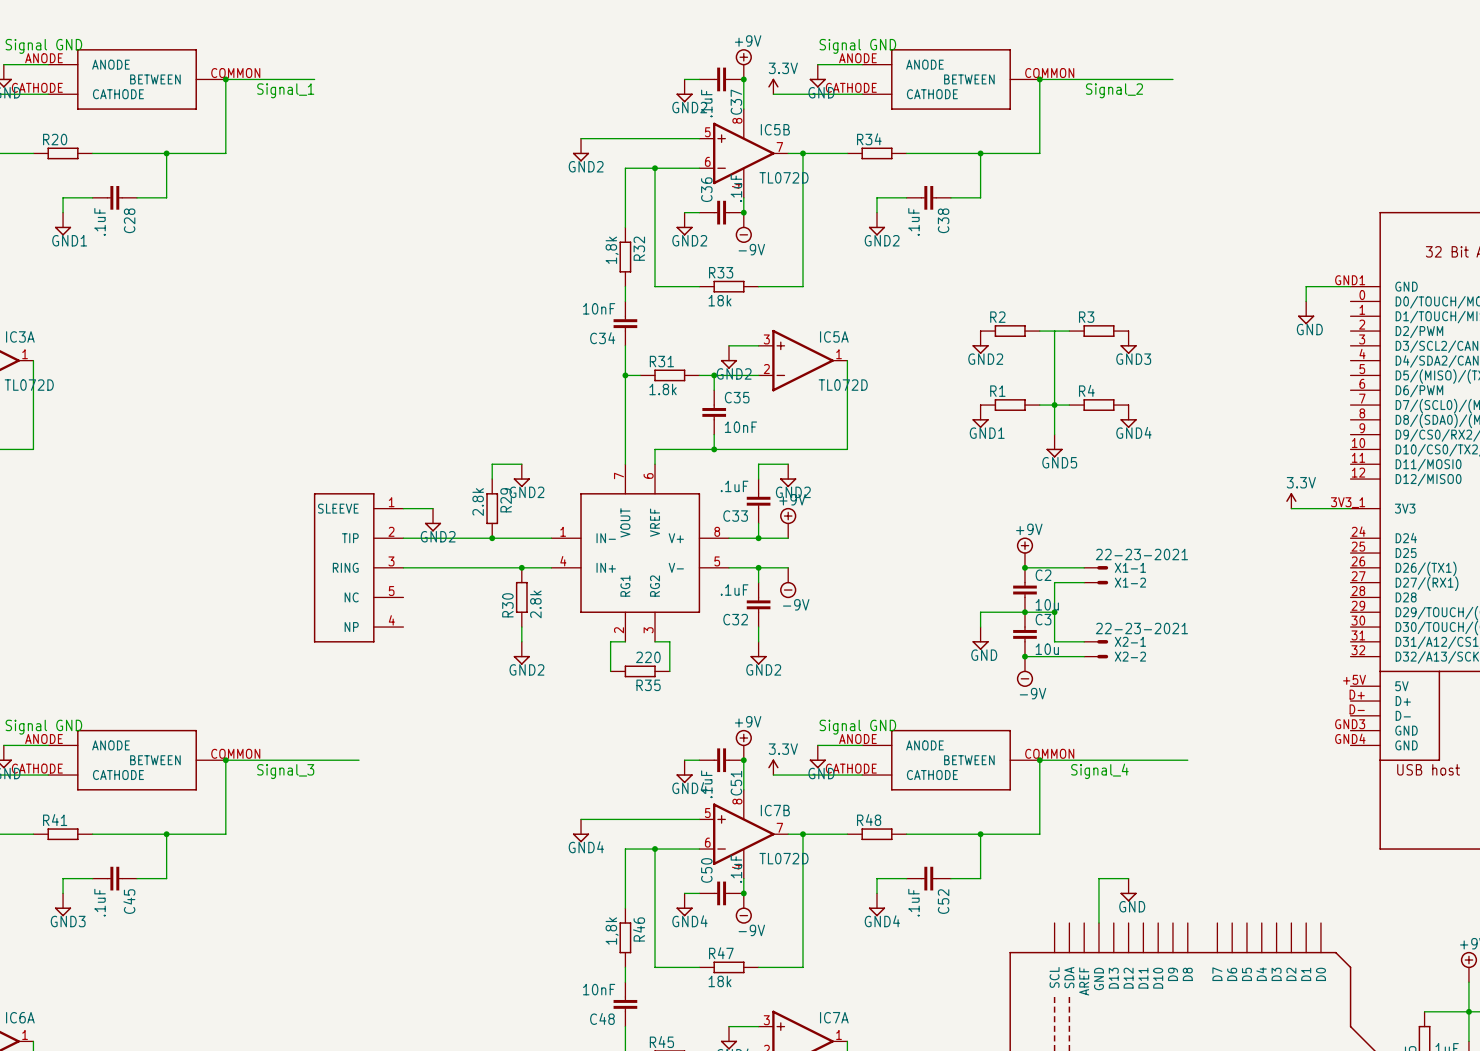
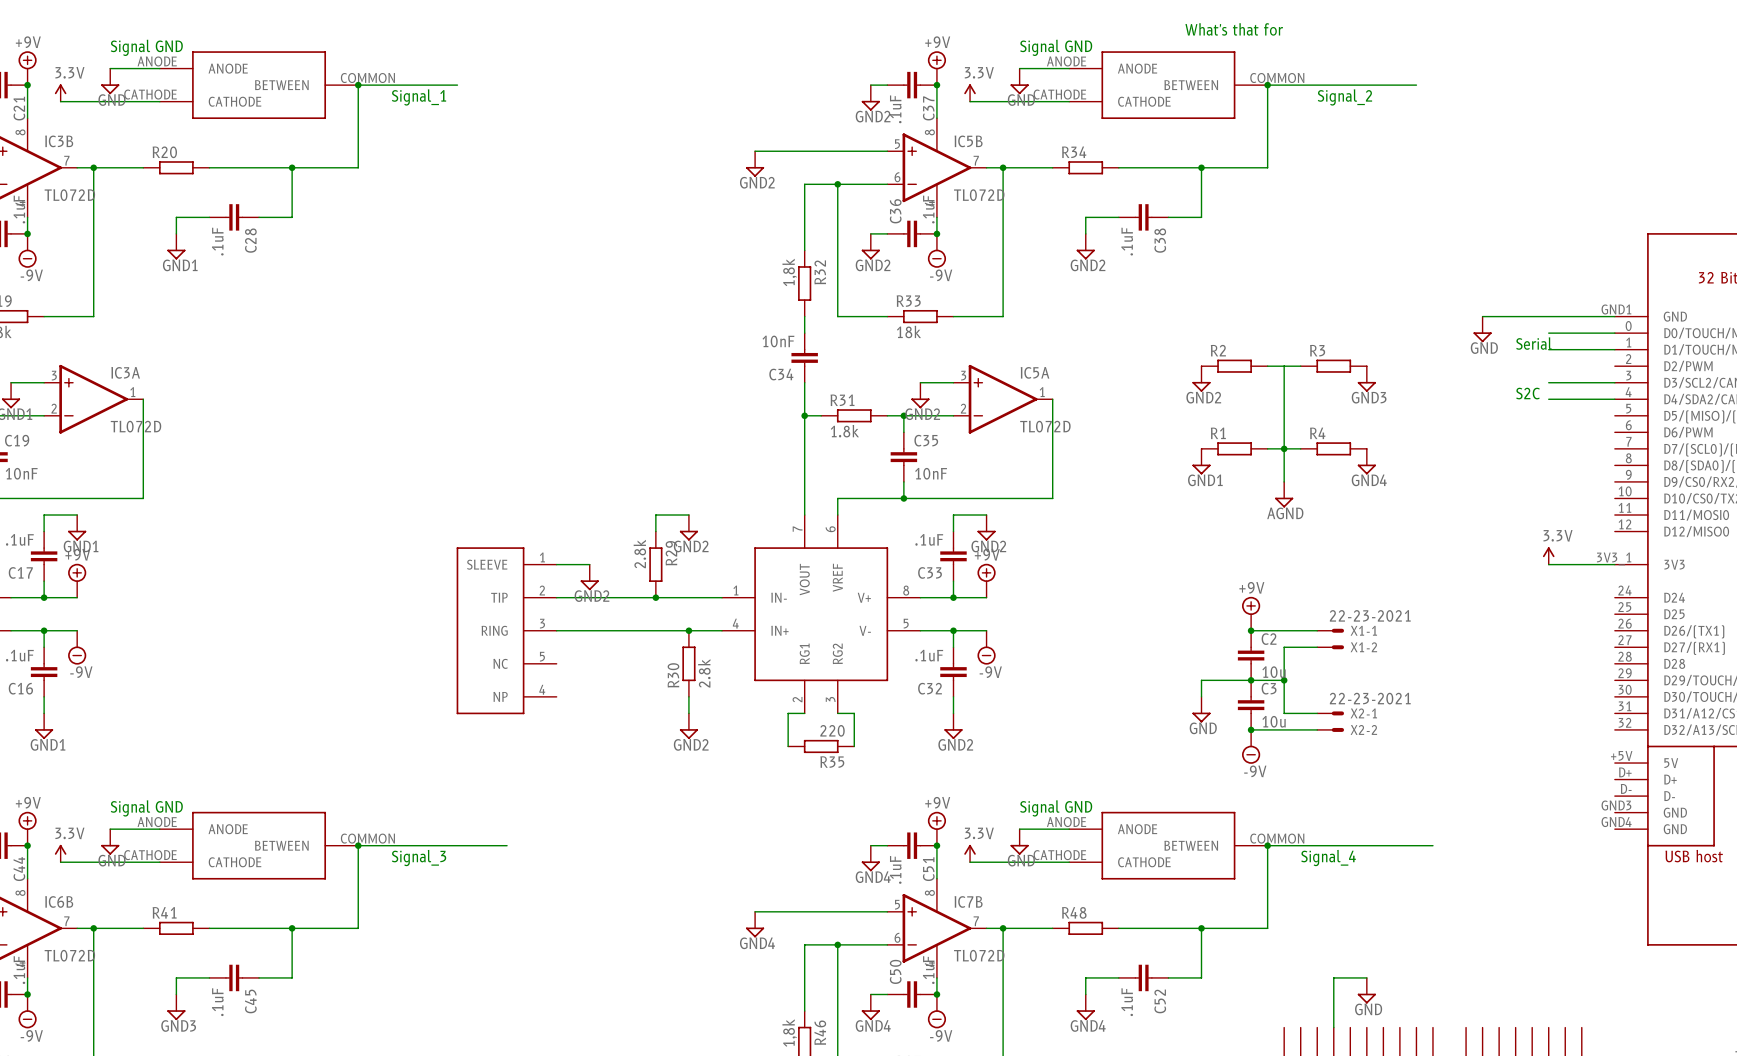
text: none -> What's that for (1234, 29)
wire: (1306, 286) (1306, 301) -> (1565, 316) (1482, 316)
wire: none -> (1548, 333) (1614, 333)
text: none -> Serial (1534, 343)
power symbol position: GND (1306, 312) -> GND (1482, 329)
wire: none -> (1548, 349) (1614, 349)
wire: none -> (1548, 382) (1614, 382)
text: none -> S2C (1528, 393)
wire: none -> (1548, 399) (1614, 399)
power symbol: GND5 (1054, 446) -> AGND (1284, 494)

